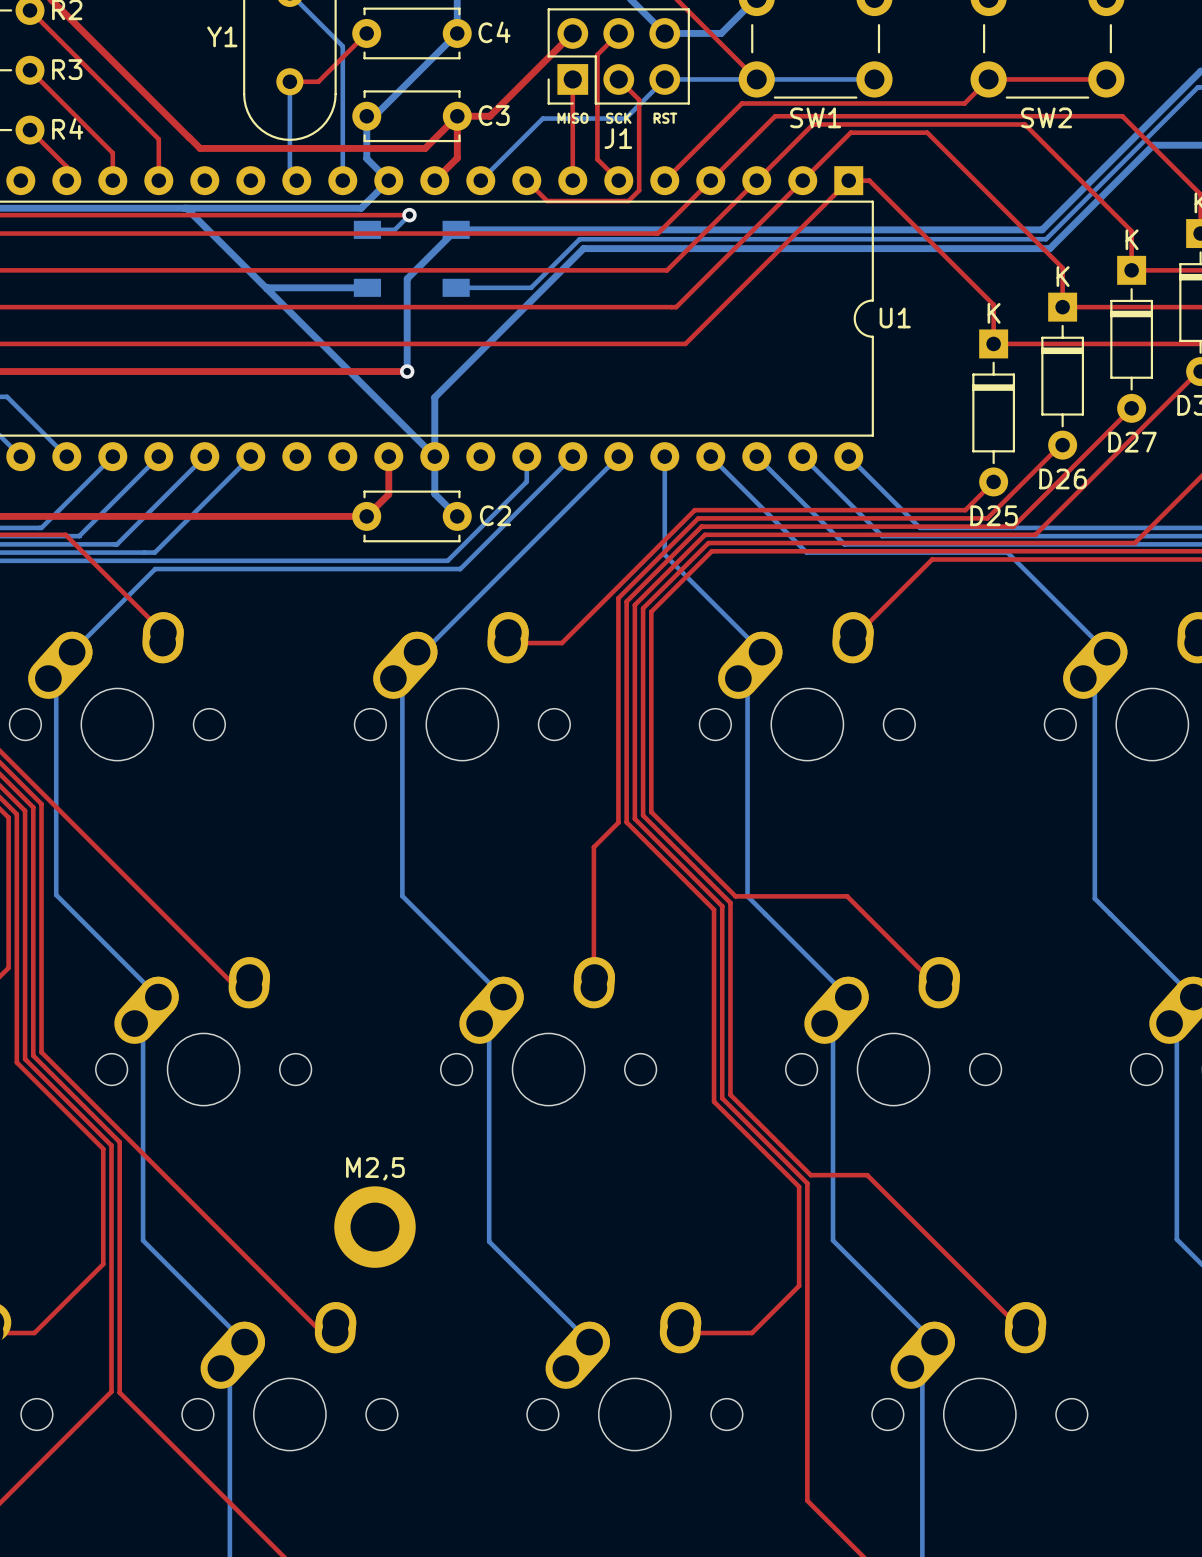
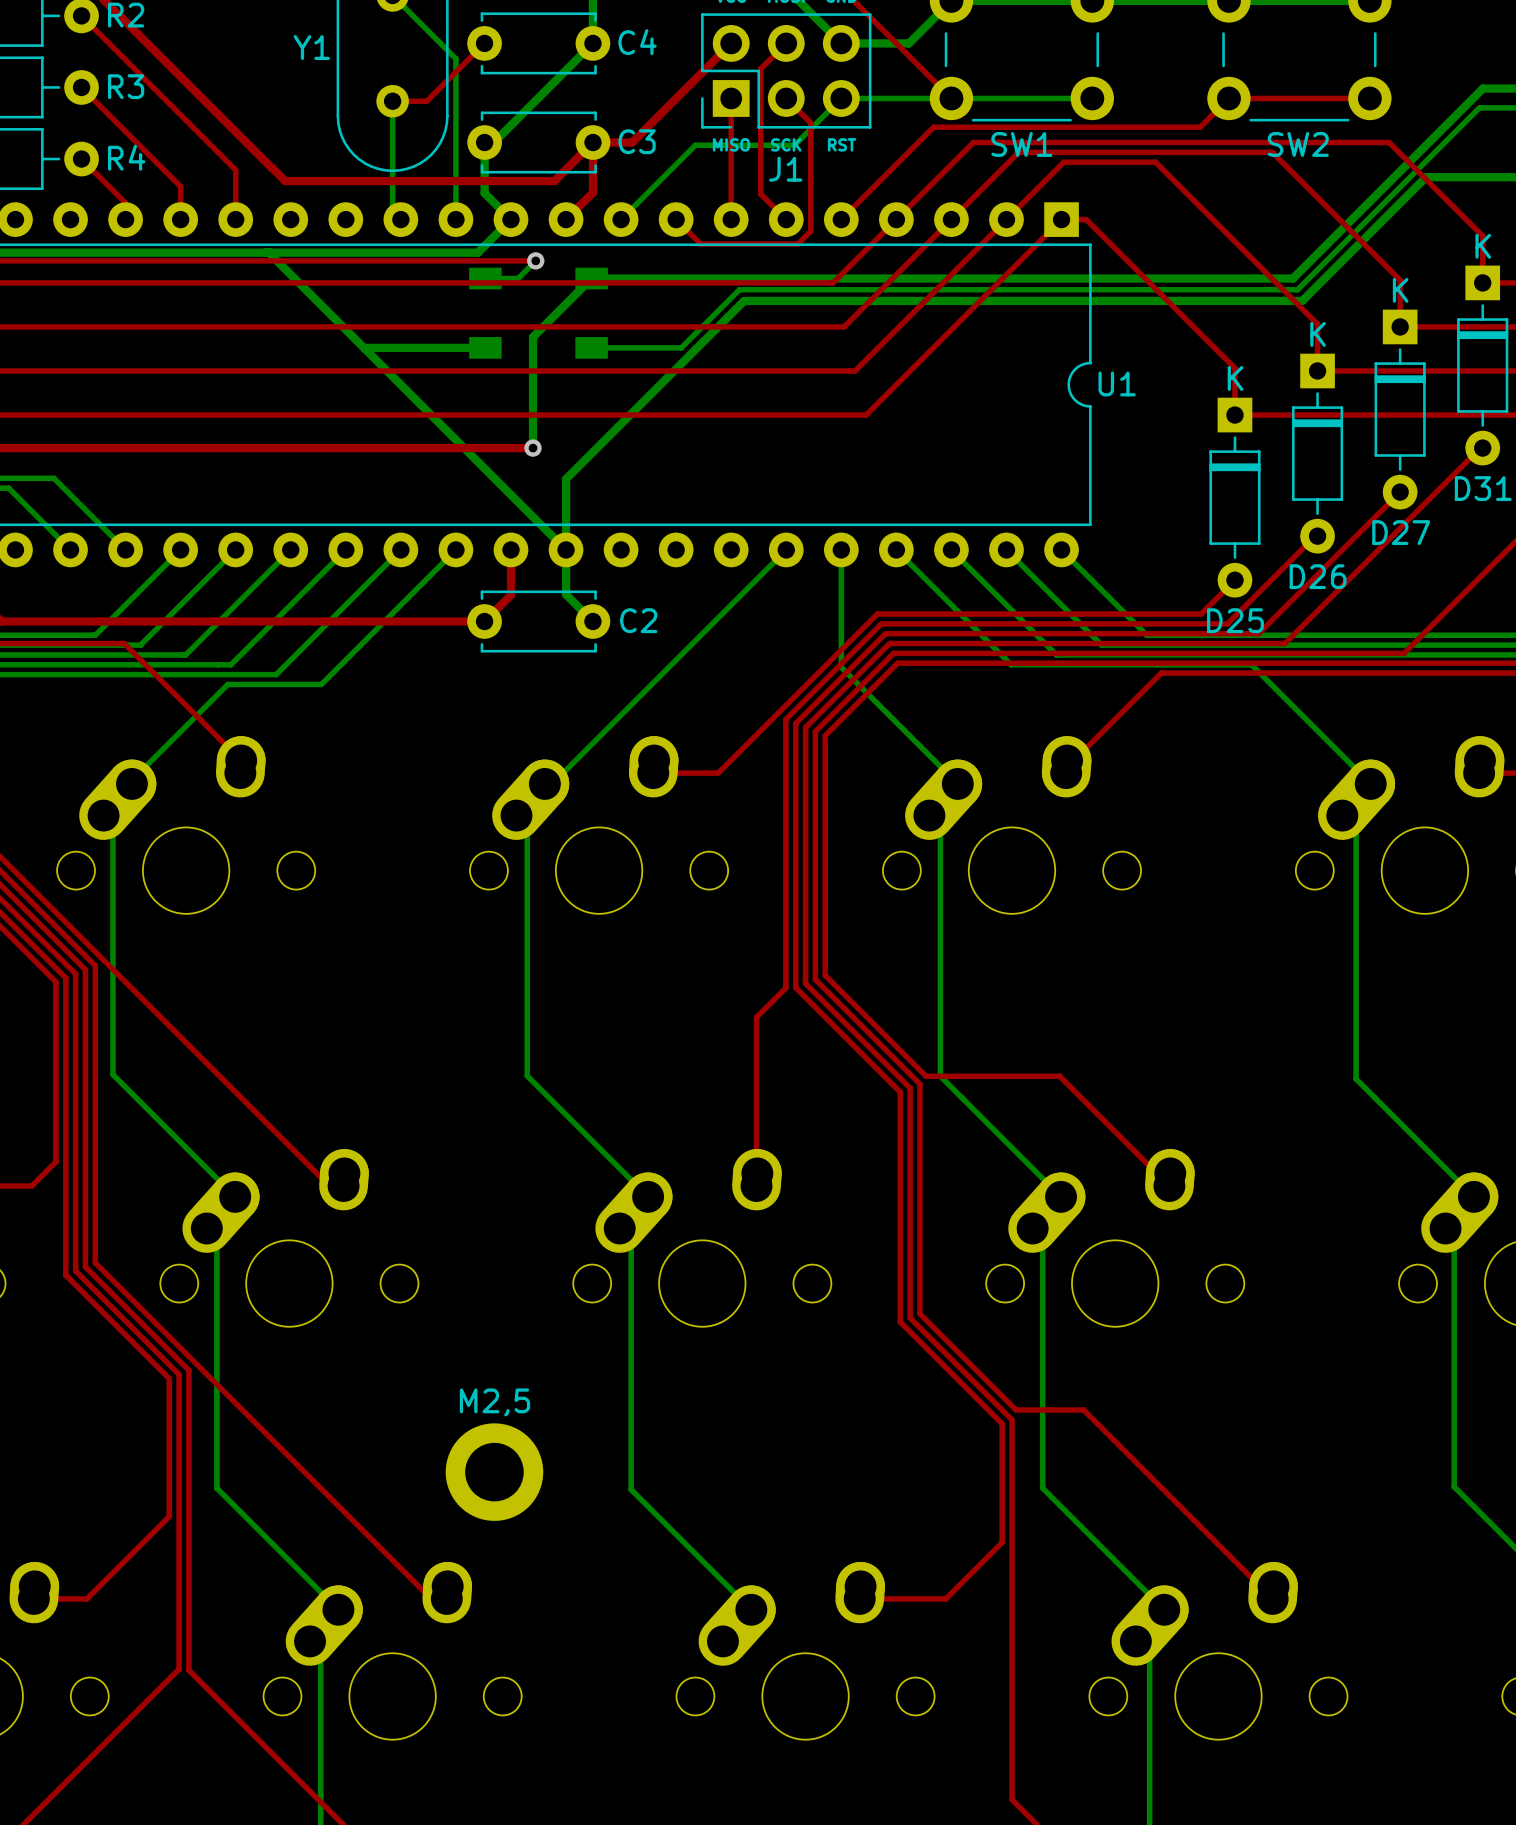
bottom track: (526, 456) (526, 481) (447, 560) (192, 560) -> (400, 549) (276, 674)
bottom track: (572, 456) (460, 569) (230, 569) -> (455, 549) (321, 684)
bottom track: (155, 569) (72, 652) -> (231, 684) (227, 684) (103, 808) (103, 815)

